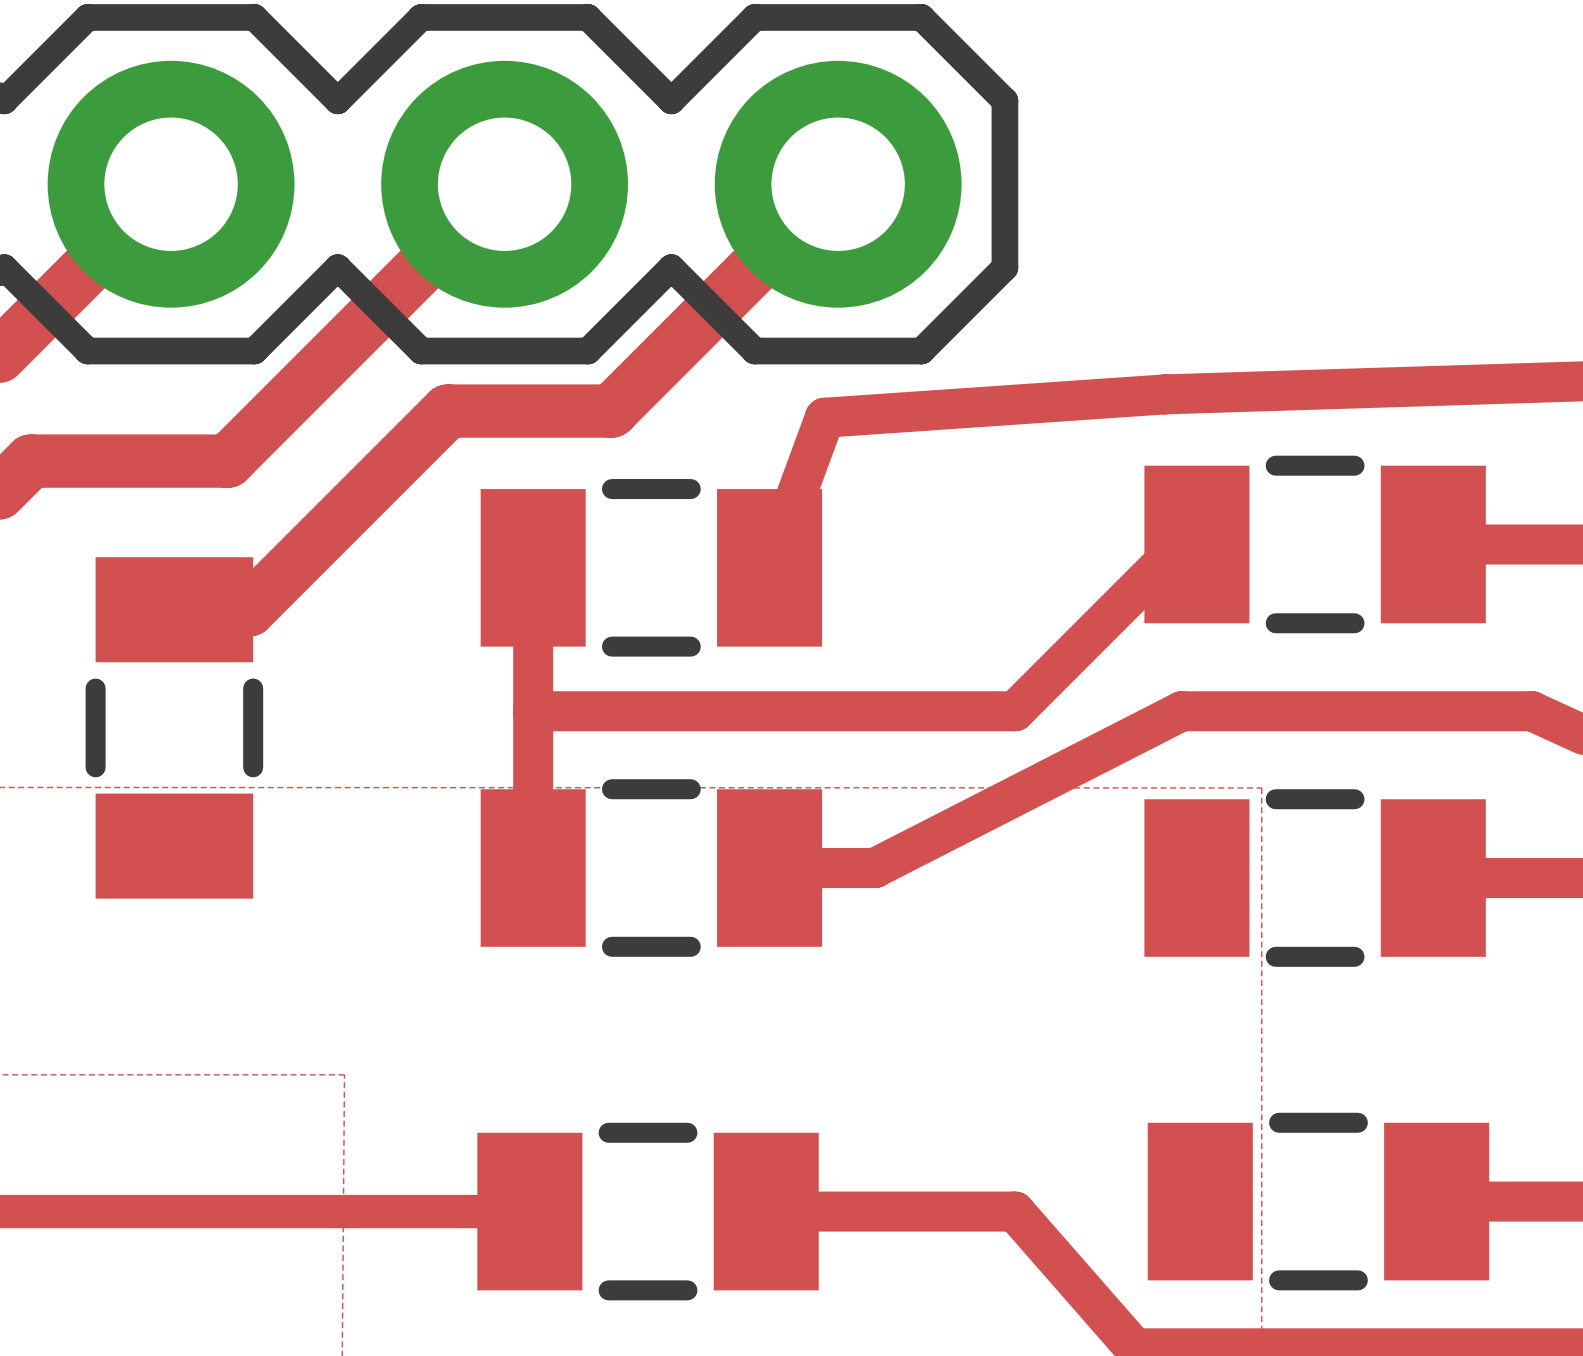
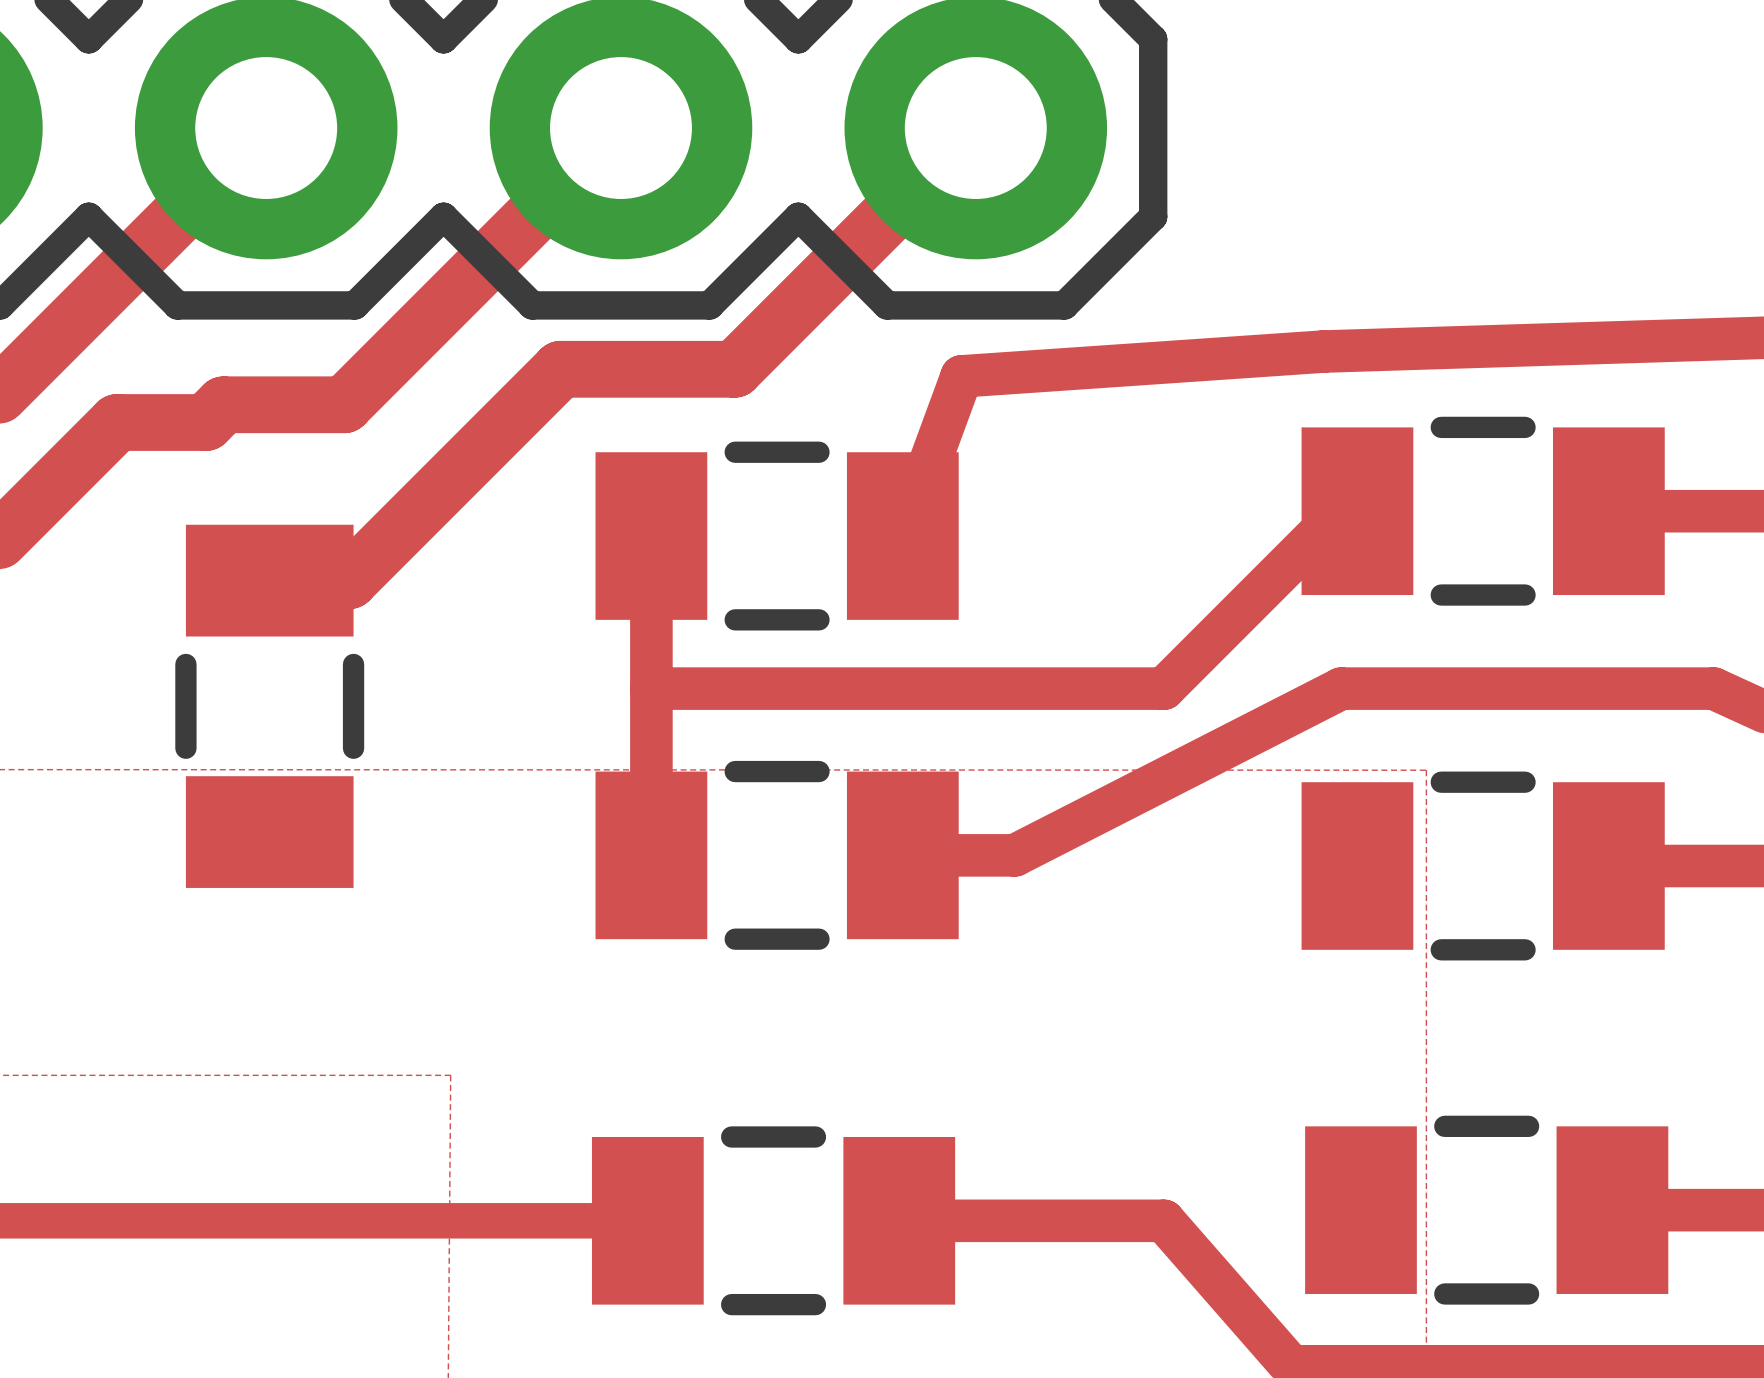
top track: (244, 444) (227, 461) (114, 461) -> (344, 404) (223, 404) (205, 422)

